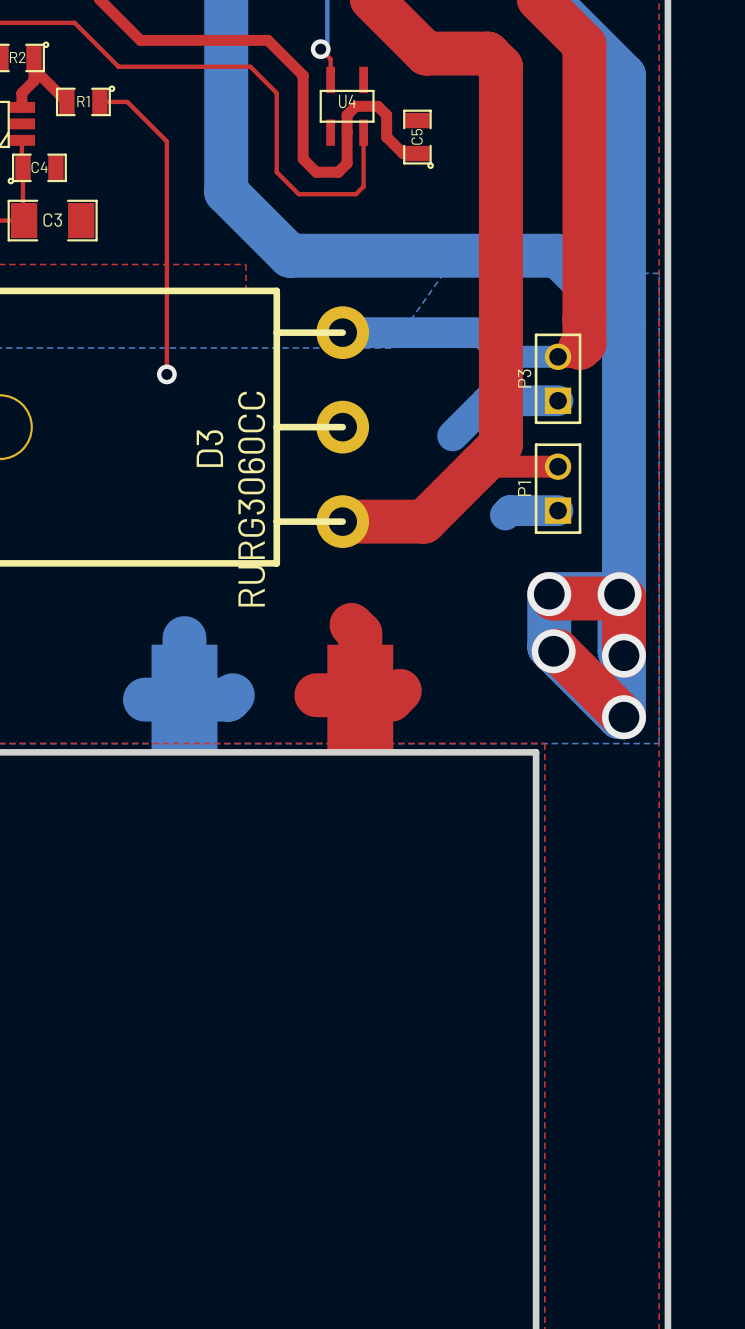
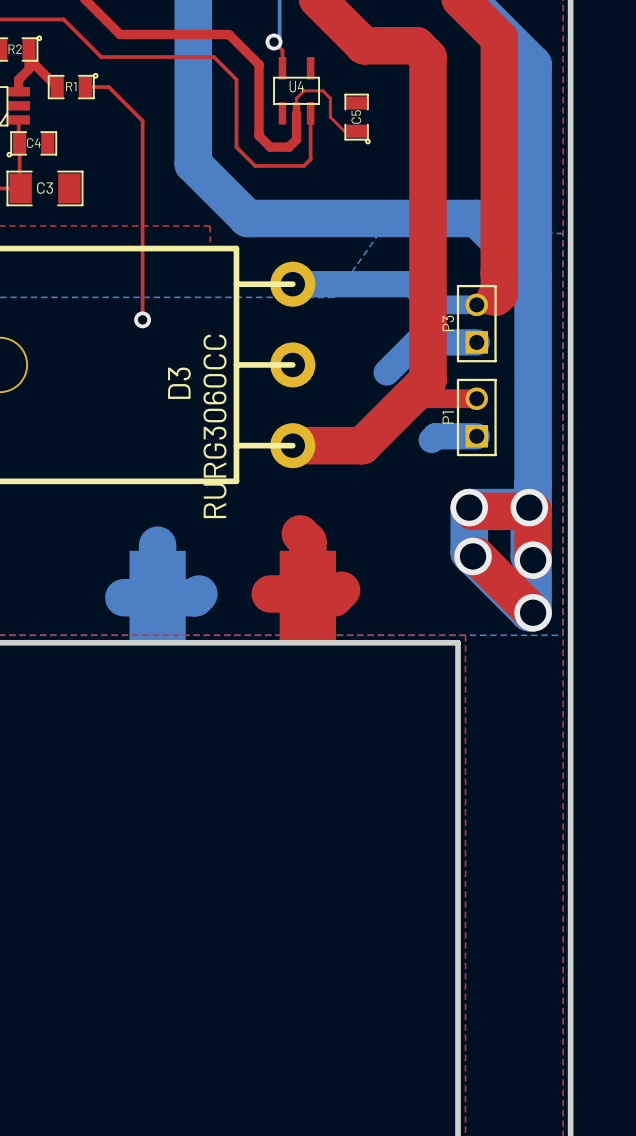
top track width: thick (347, 132) (347, 115) (355, 106) (377, 106) (386, 115) (386, 137) (403, 153) (417, 153) -> thin (296, 113) (296, 98) (304, 90) (322, 90) (330, 98) (330, 117) (344, 131) (356, 131)

